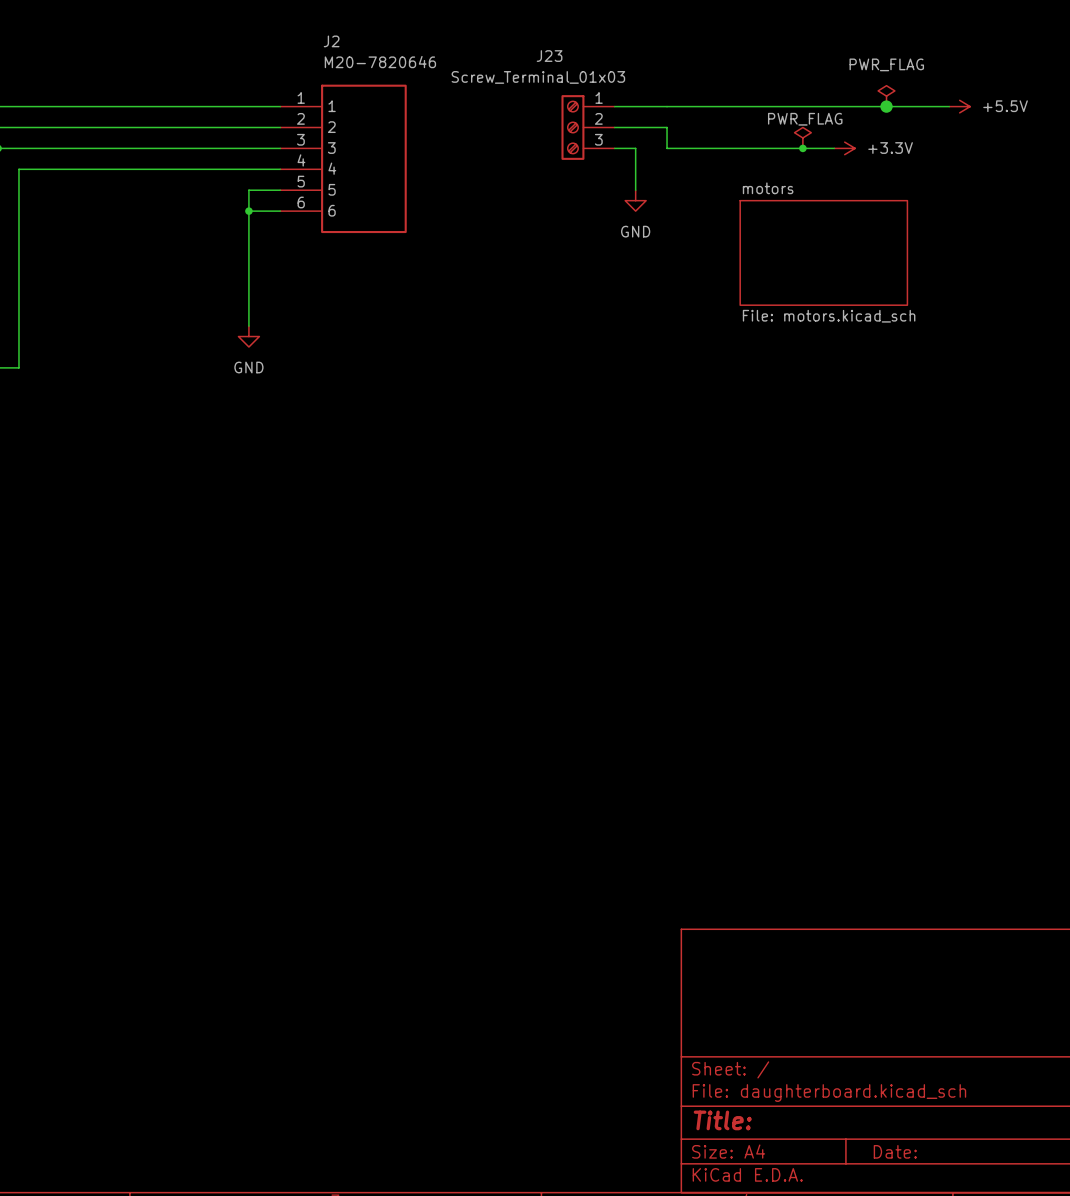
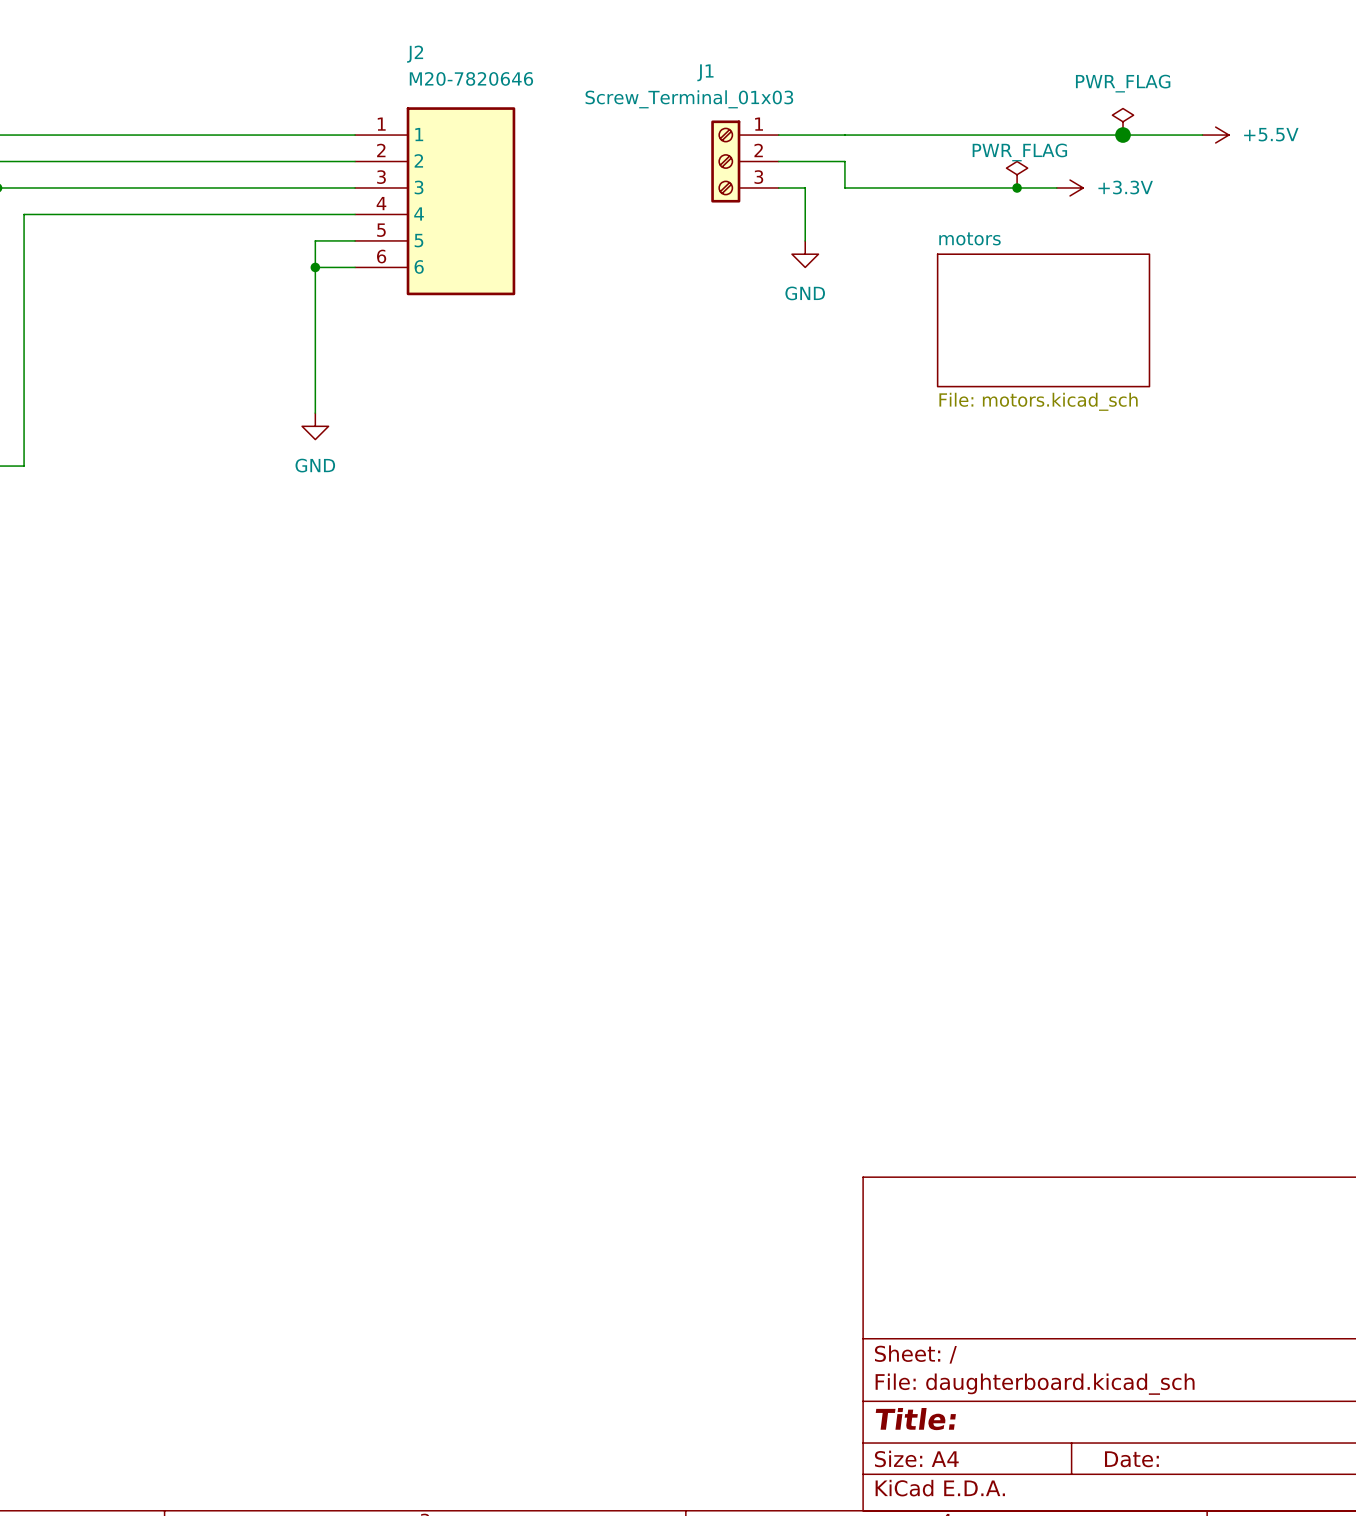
J23 name: J23 (549, 56) -> J1 (705, 72)

